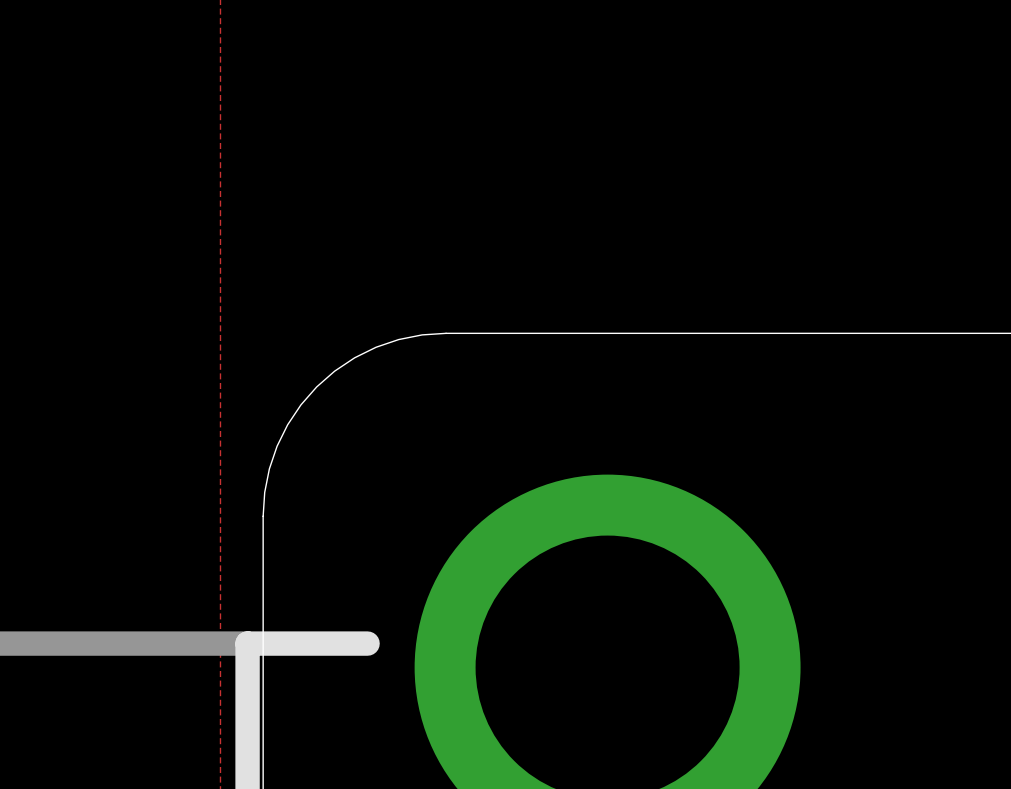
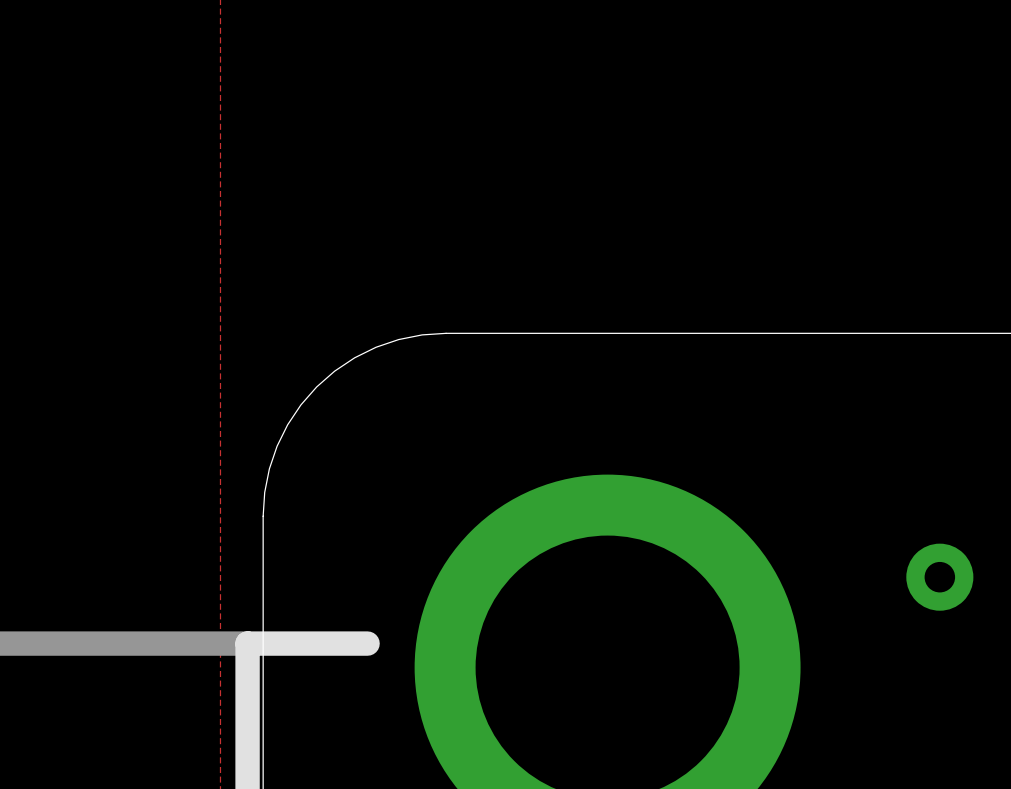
via: none -> (939, 577)

